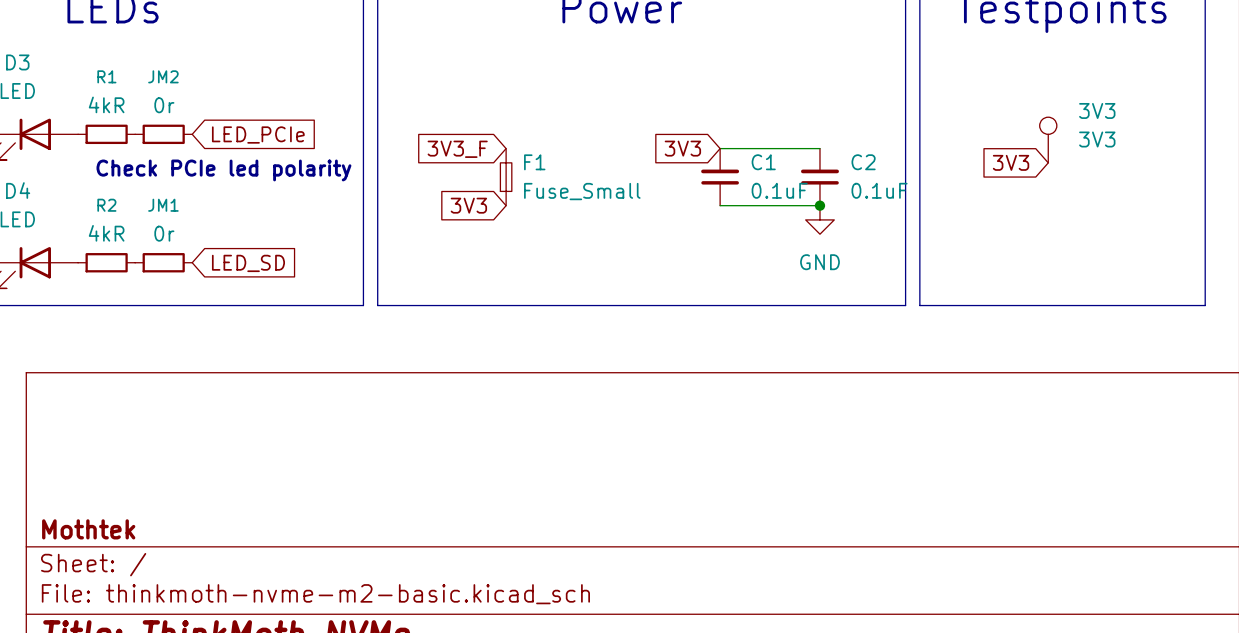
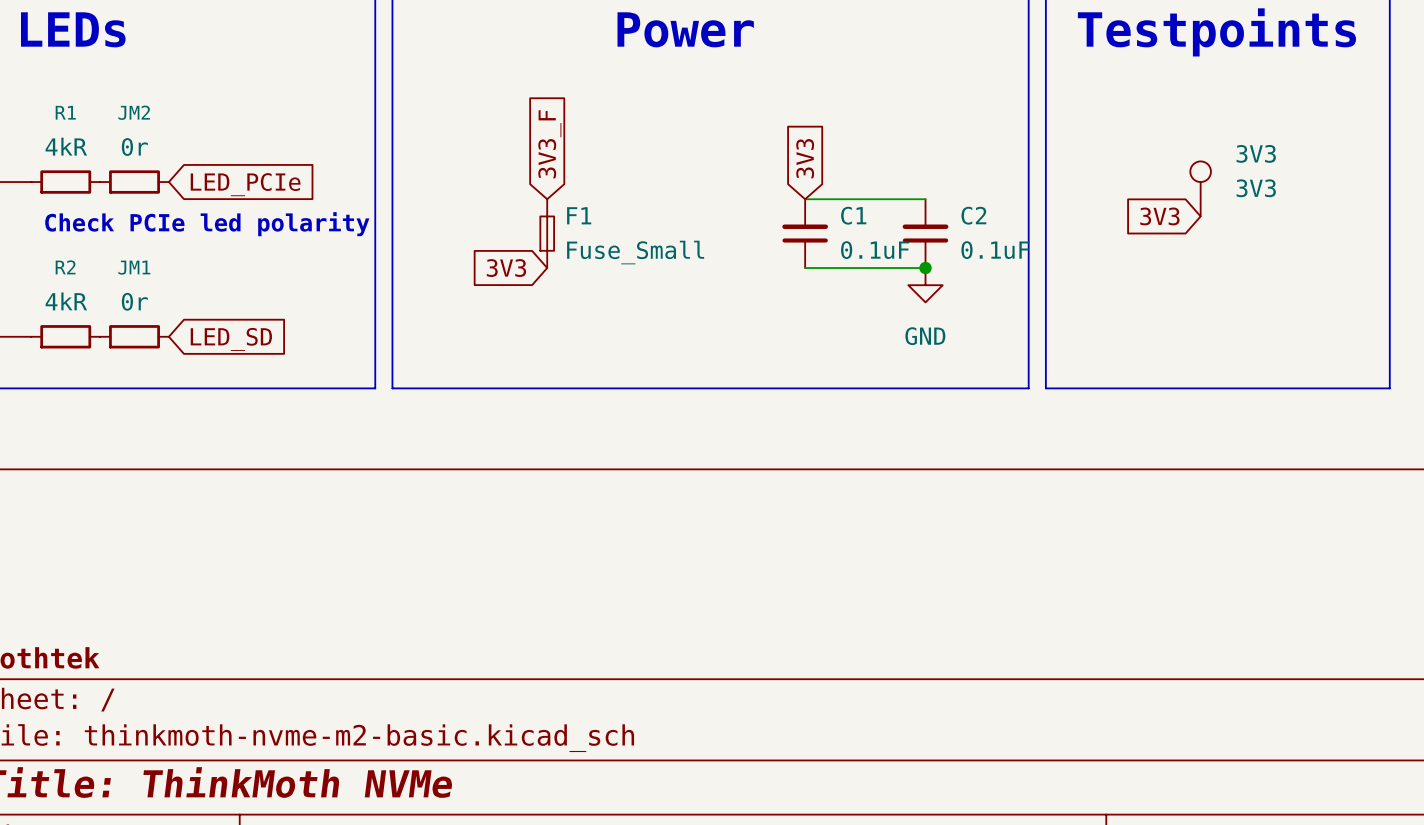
global label rotation: 0° (682, 148) -> 90° clockwise (805, 158)
global label rotation: 0° (457, 149) -> 90° clockwise (549, 144)

